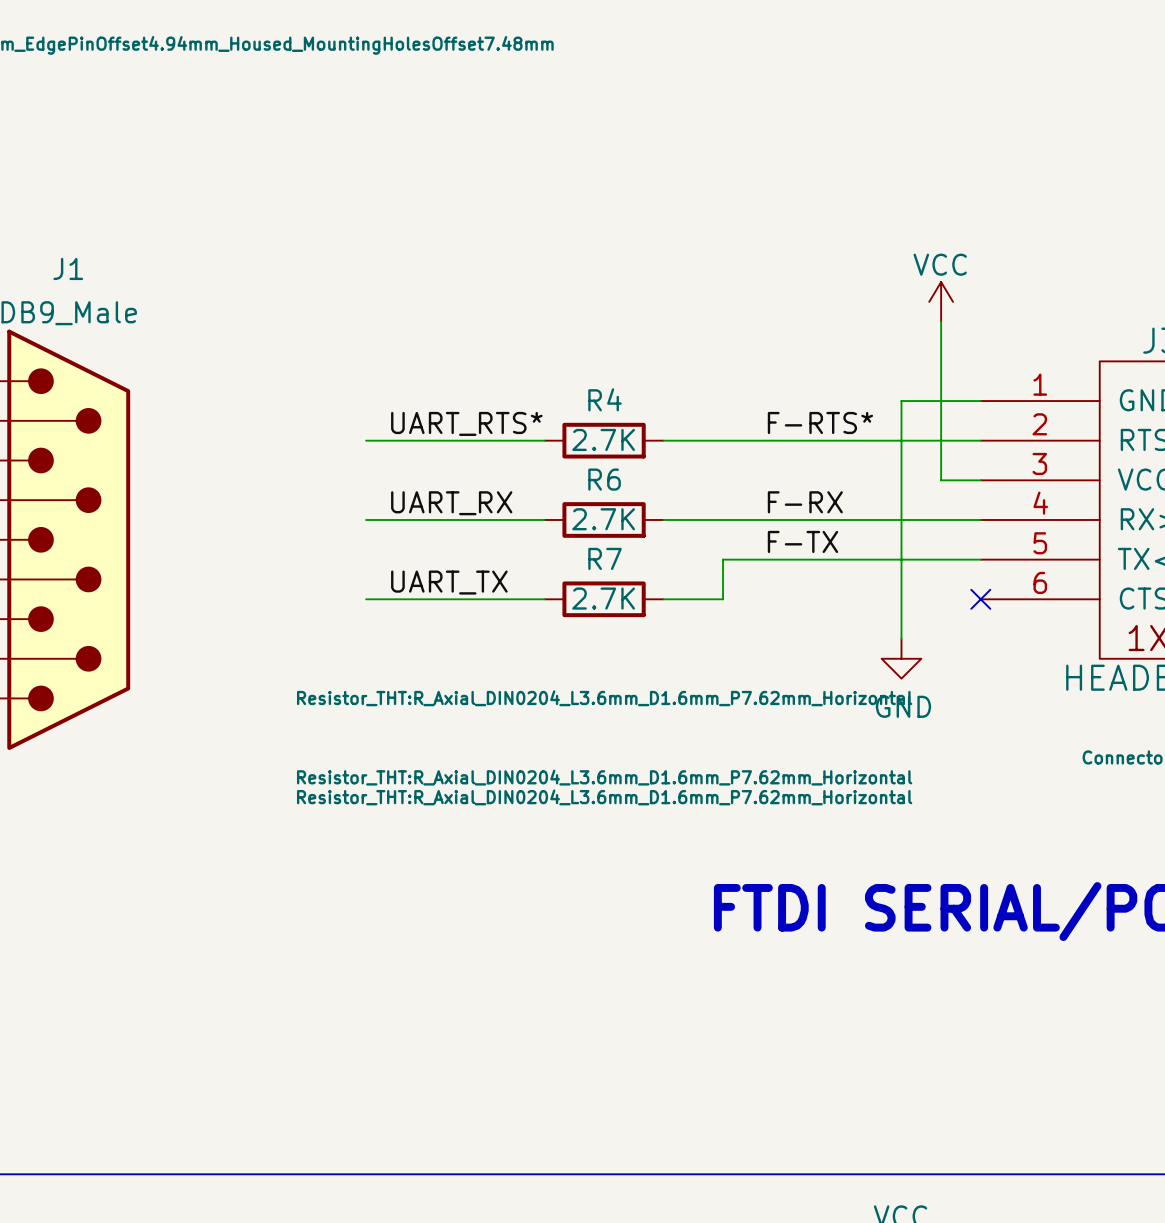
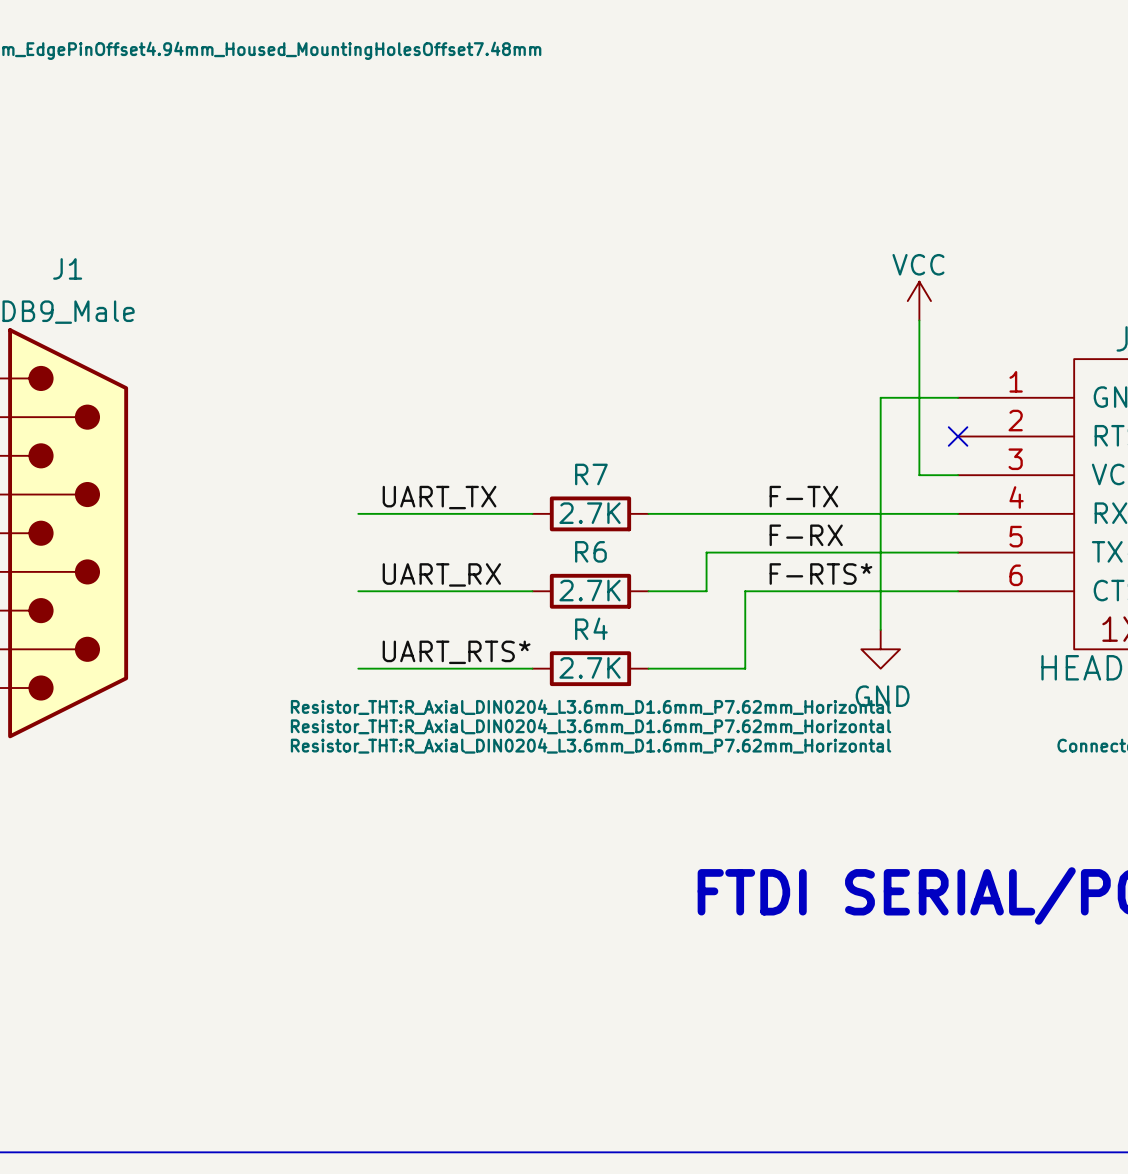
label position: F-RTS* (820, 422) -> F-RTS* (820, 574)
label position: UART_RTS* (466, 423) -> UART_RTS* (456, 652)
wire: (366, 440) (544, 440) -> (358, 668) (532, 668)
R4 position: (604, 440) -> (590, 668)
wire: (663, 440) (980, 440) -> none
no-connect mark: none -> (958, 436)
R6 name: R6 (604, 479) -> R7 (591, 474)
label position: F-RX (805, 502) -> F-RX (806, 535)
label: UART_RX (451, 503) -> UART_TX (439, 497)
label position: F-TX (802, 541) -> F-TX (803, 496)
R7 name: R7 (605, 558) -> R6 (590, 551)
label: UART_TX (449, 582) -> UART_RX (441, 574)
wire: none -> (958, 591) (745, 591) (745, 668) (648, 668)
no-connect mark: (980, 599) -> none
R4 text position: Resistor_THT:R_Axial_DIN0204_L3.6mm_D1.6mm_P7.62mm_Horizontal (604, 698) -> Resistor_THT:R_Axial_DIN0204_L3.6mm_D1.6mm_P7.62mm_Horizontal (591, 745)
R6 text position: Resistor_THT:R_Axial_DIN0204_L3.6mm_D1.6mm_P7.62mm_Horizontal (604, 777) -> Resistor_THT:R_Axial_DIN0204_L3.6mm_D1.6mm_P7.62mm_Horizontal (591, 707)
R7 text position: Resistor_THT:R_Axial_DIN0204_L3.6mm_D1.6mm_P7.62mm_Horizontal (604, 797) -> Resistor_THT:R_Axial_DIN0204_L3.6mm_D1.6mm_P7.62mm_Horizontal (591, 726)

